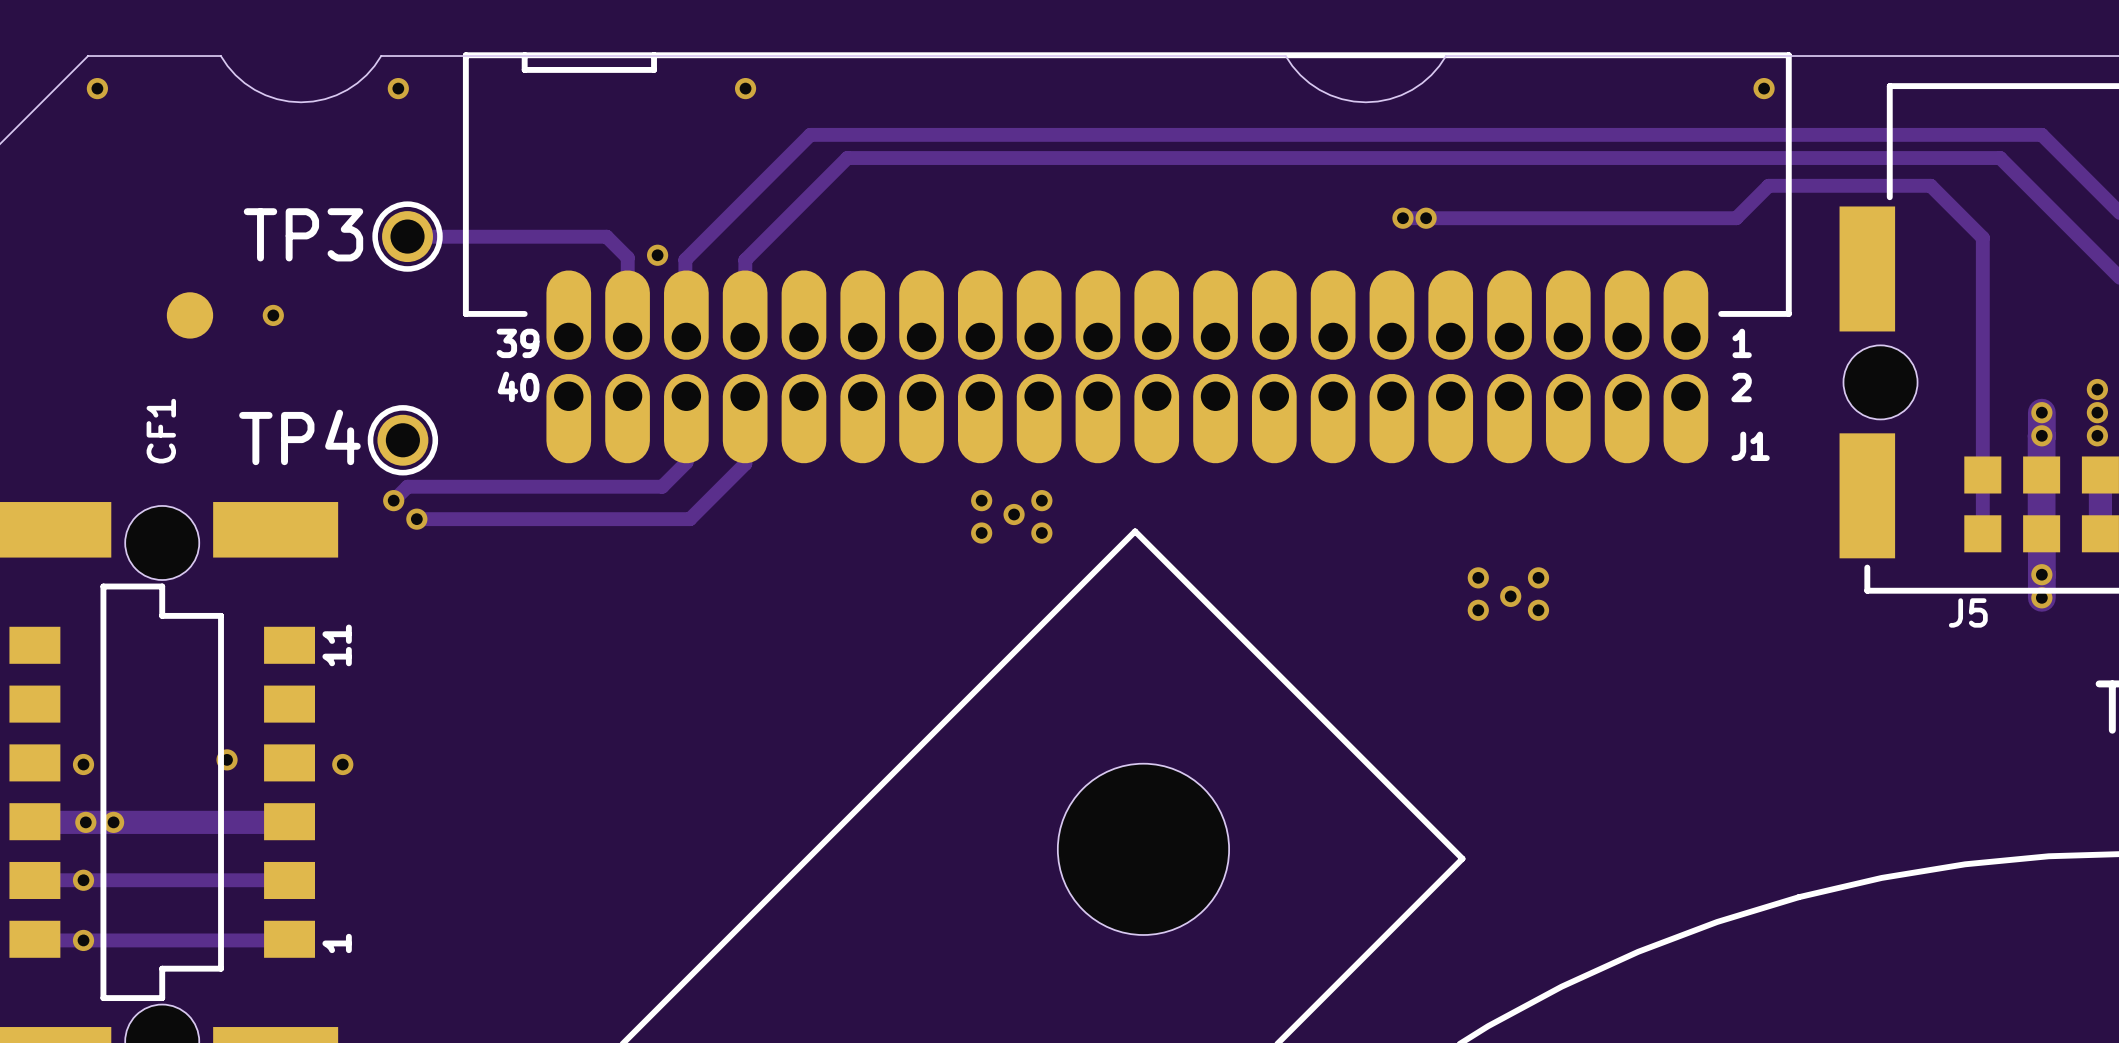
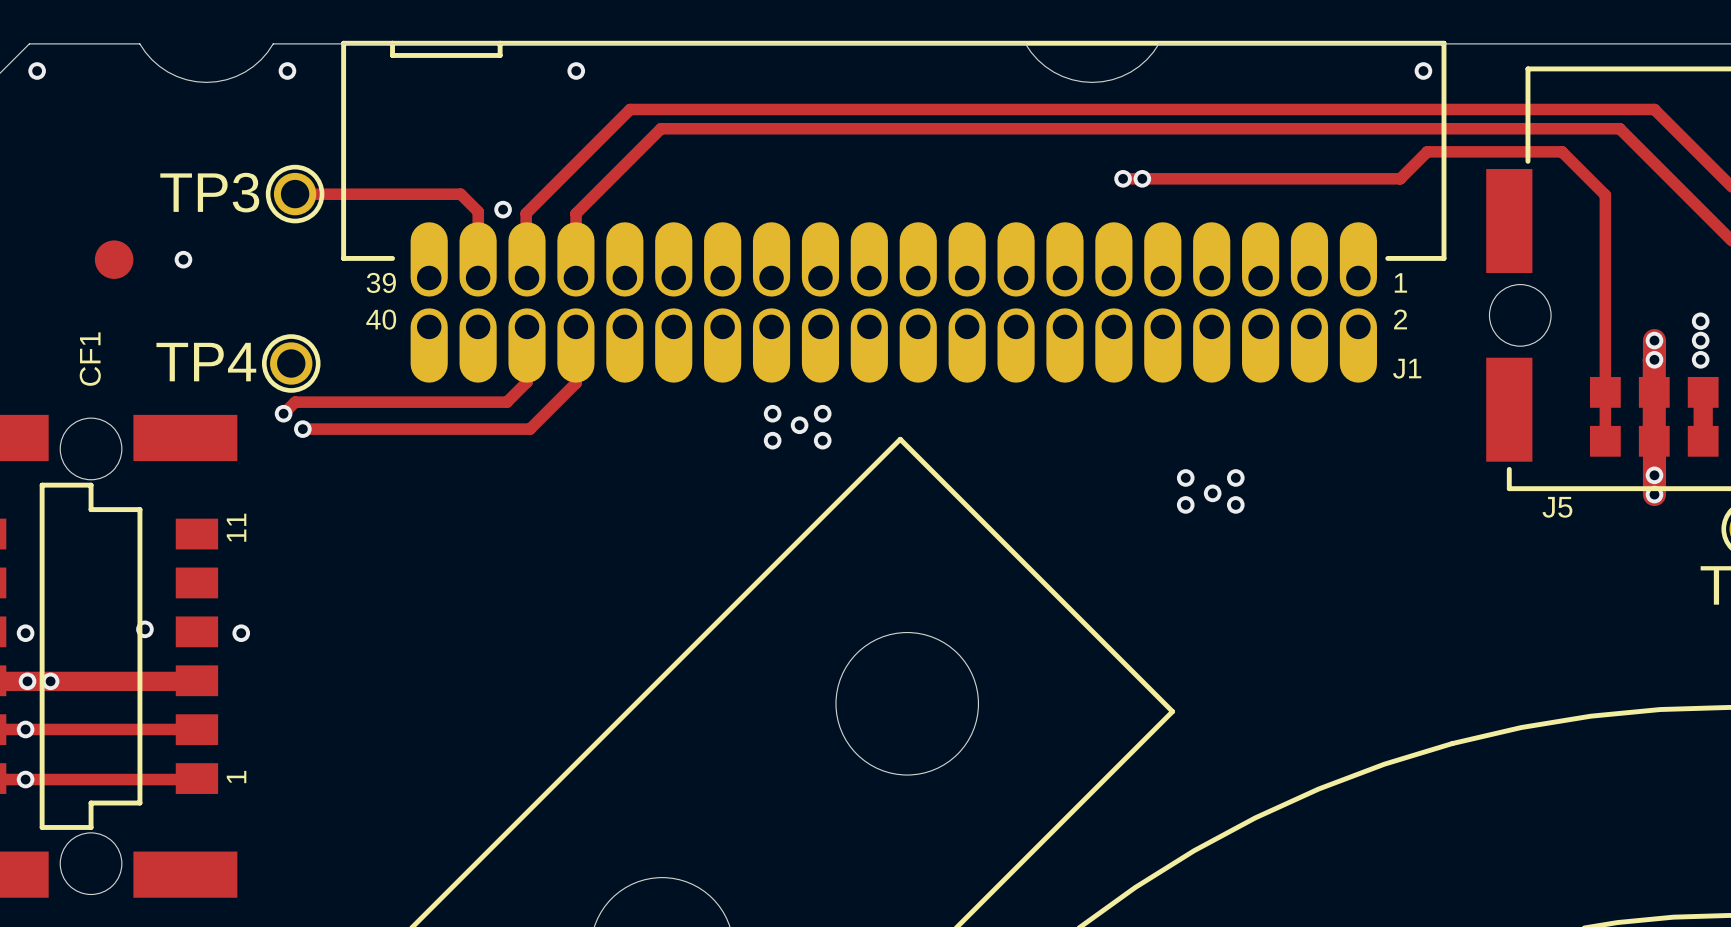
J5 name position: J5 (1968, 612) -> J5 (1557, 507)

